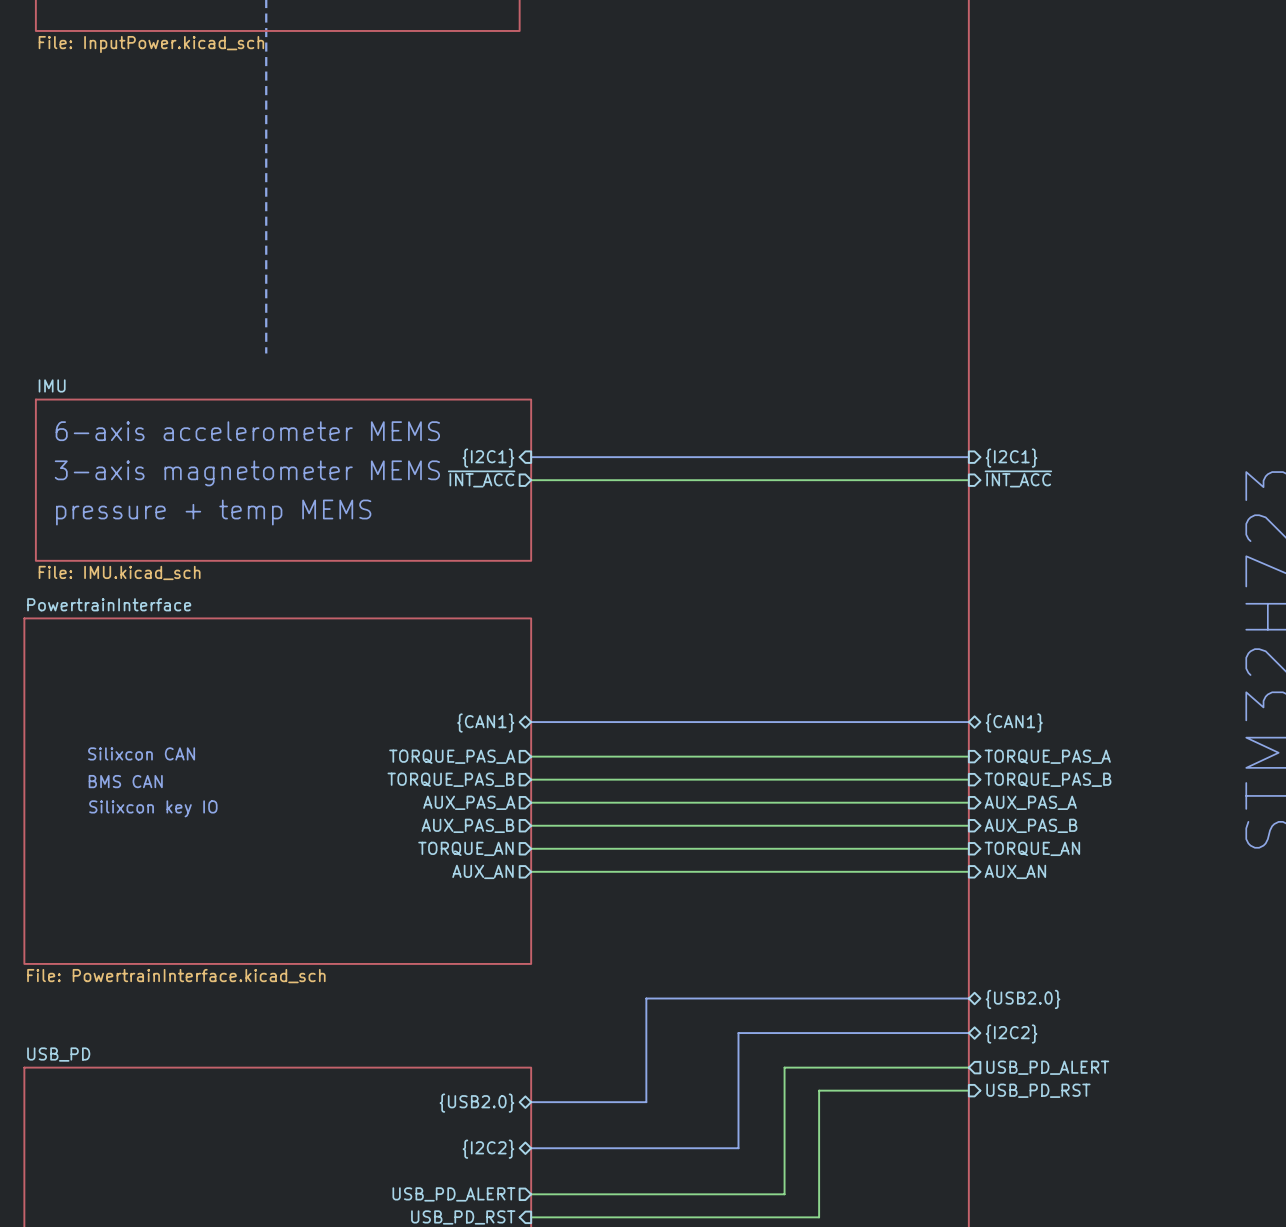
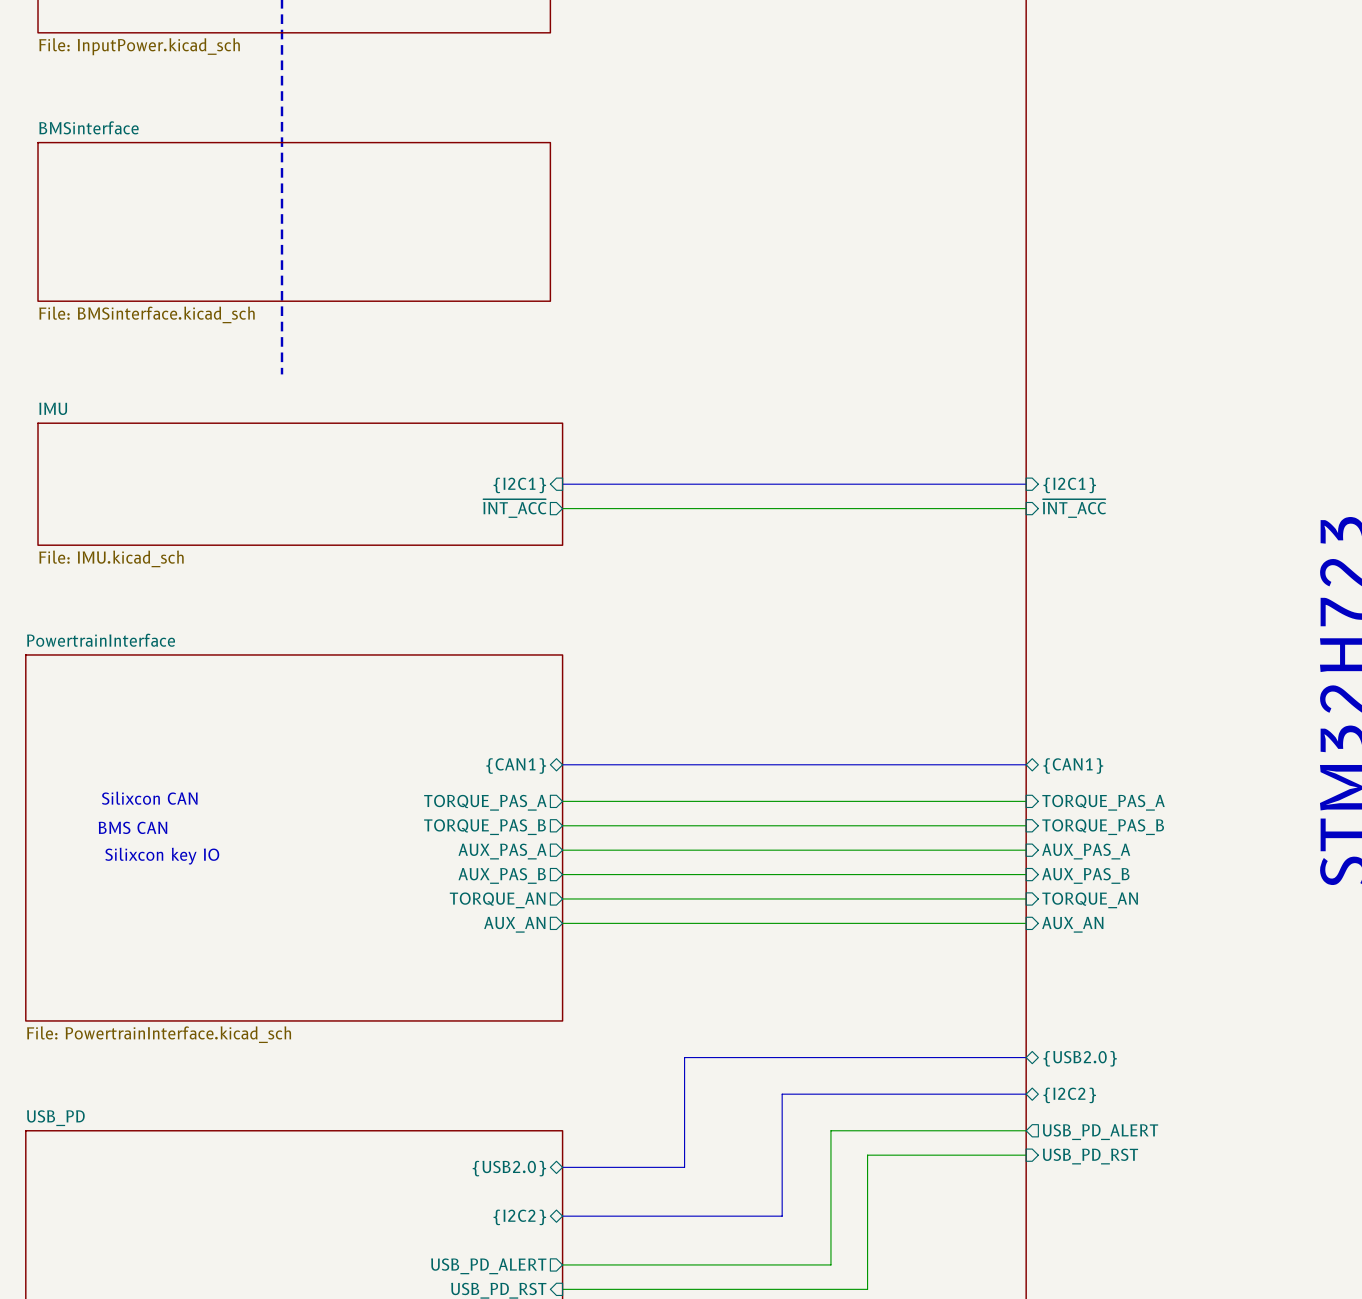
sheet BMSinterface: none -> File: BMSinterface.kicad_sch (294, 221)
text: 6-axis accelerometer MEMS (247, 431) -> none
sheet IMU: none -> File: IMU.kicad_sch (300, 484)
text: 3-axis magnetometer MEMS (247, 473) -> none
sheet IMU: File: IMU.kicad_sch (283, 480) -> none
text: pressure + temp MEMS (213, 512) -> none

